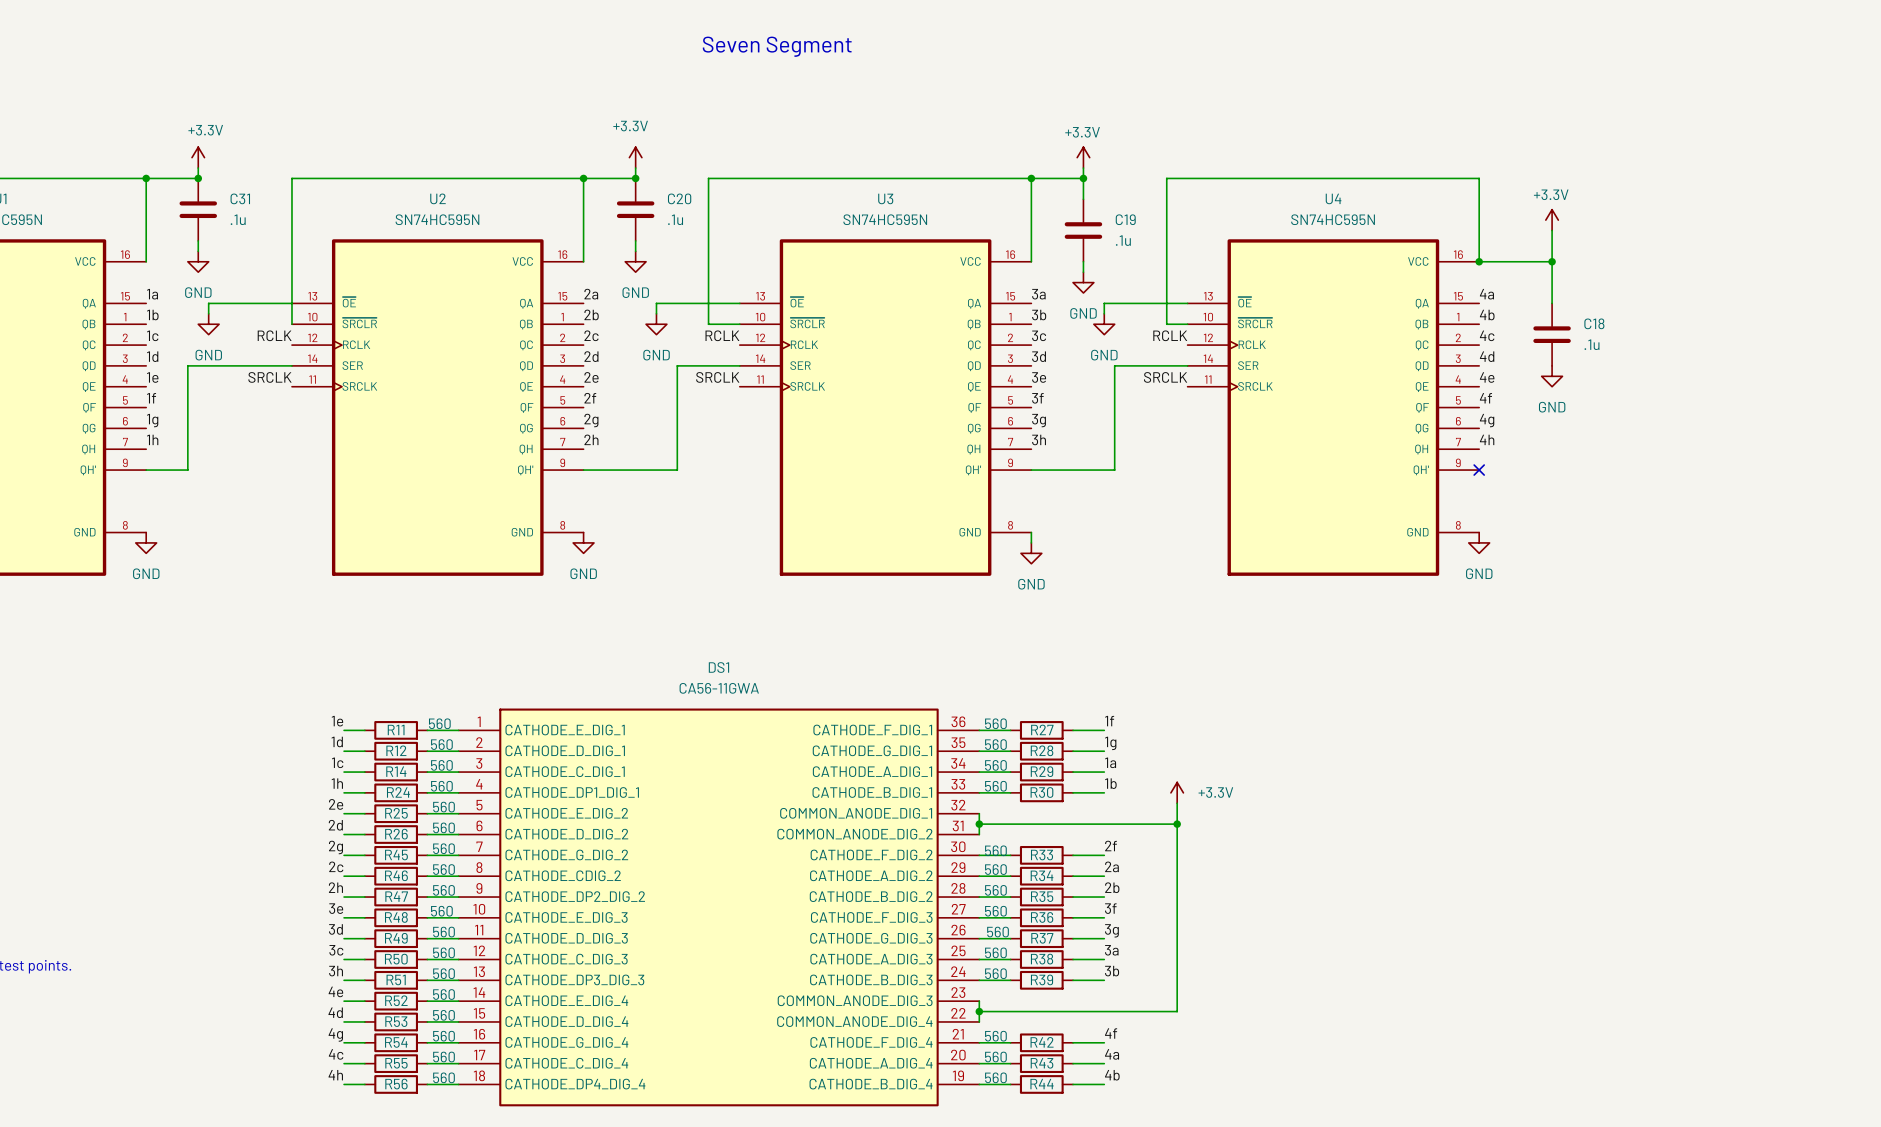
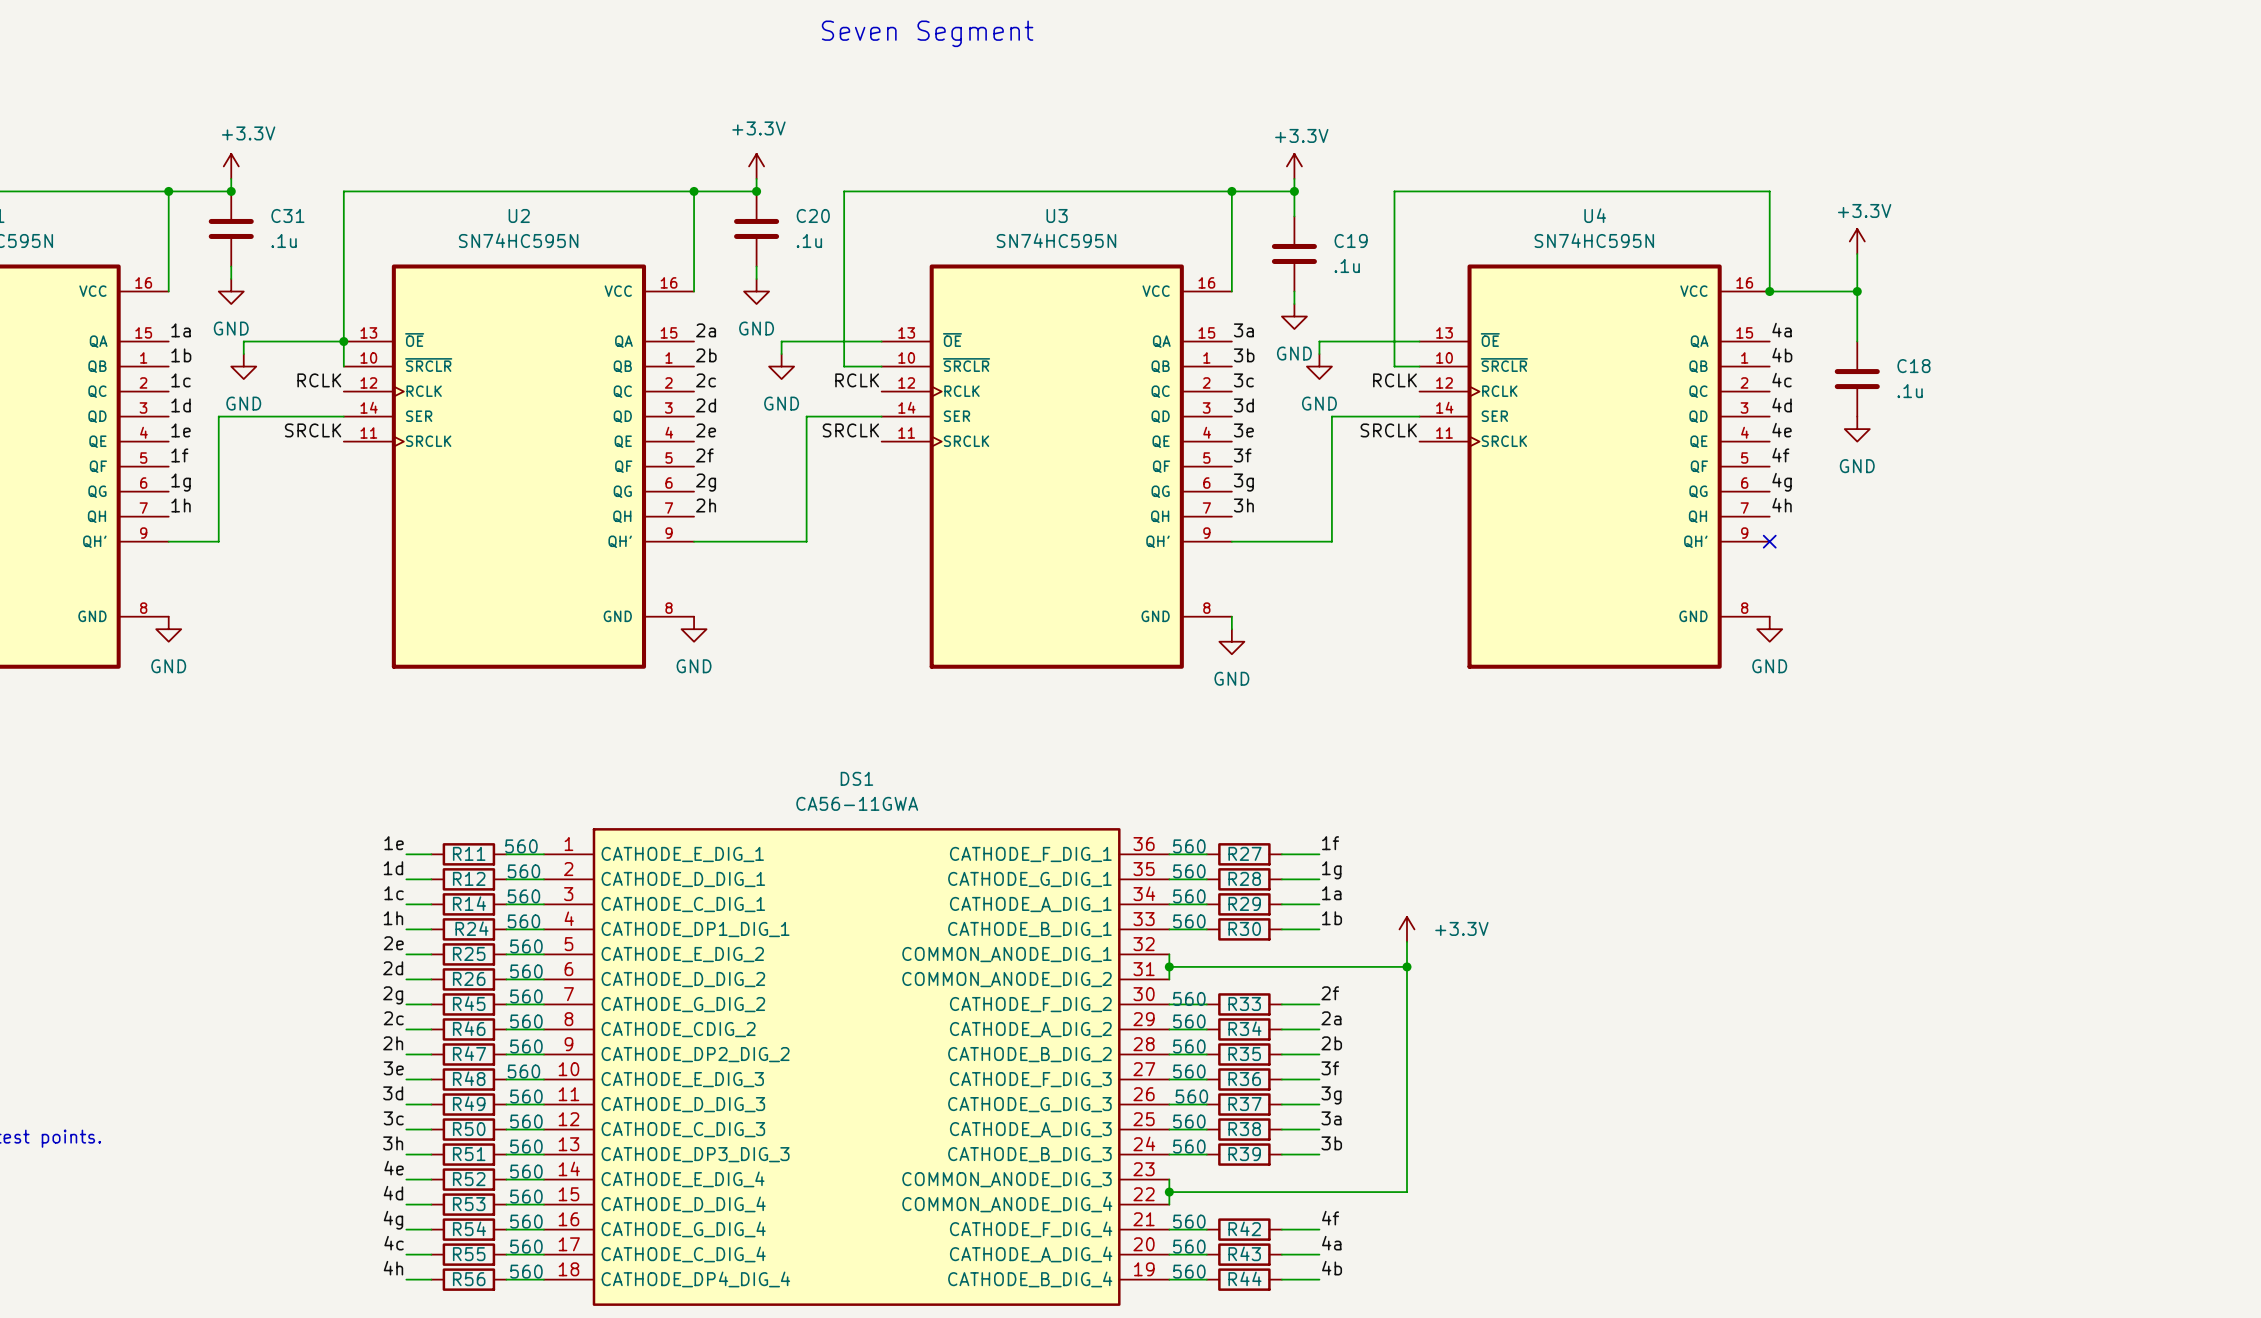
junction: none -> (343, 341)

